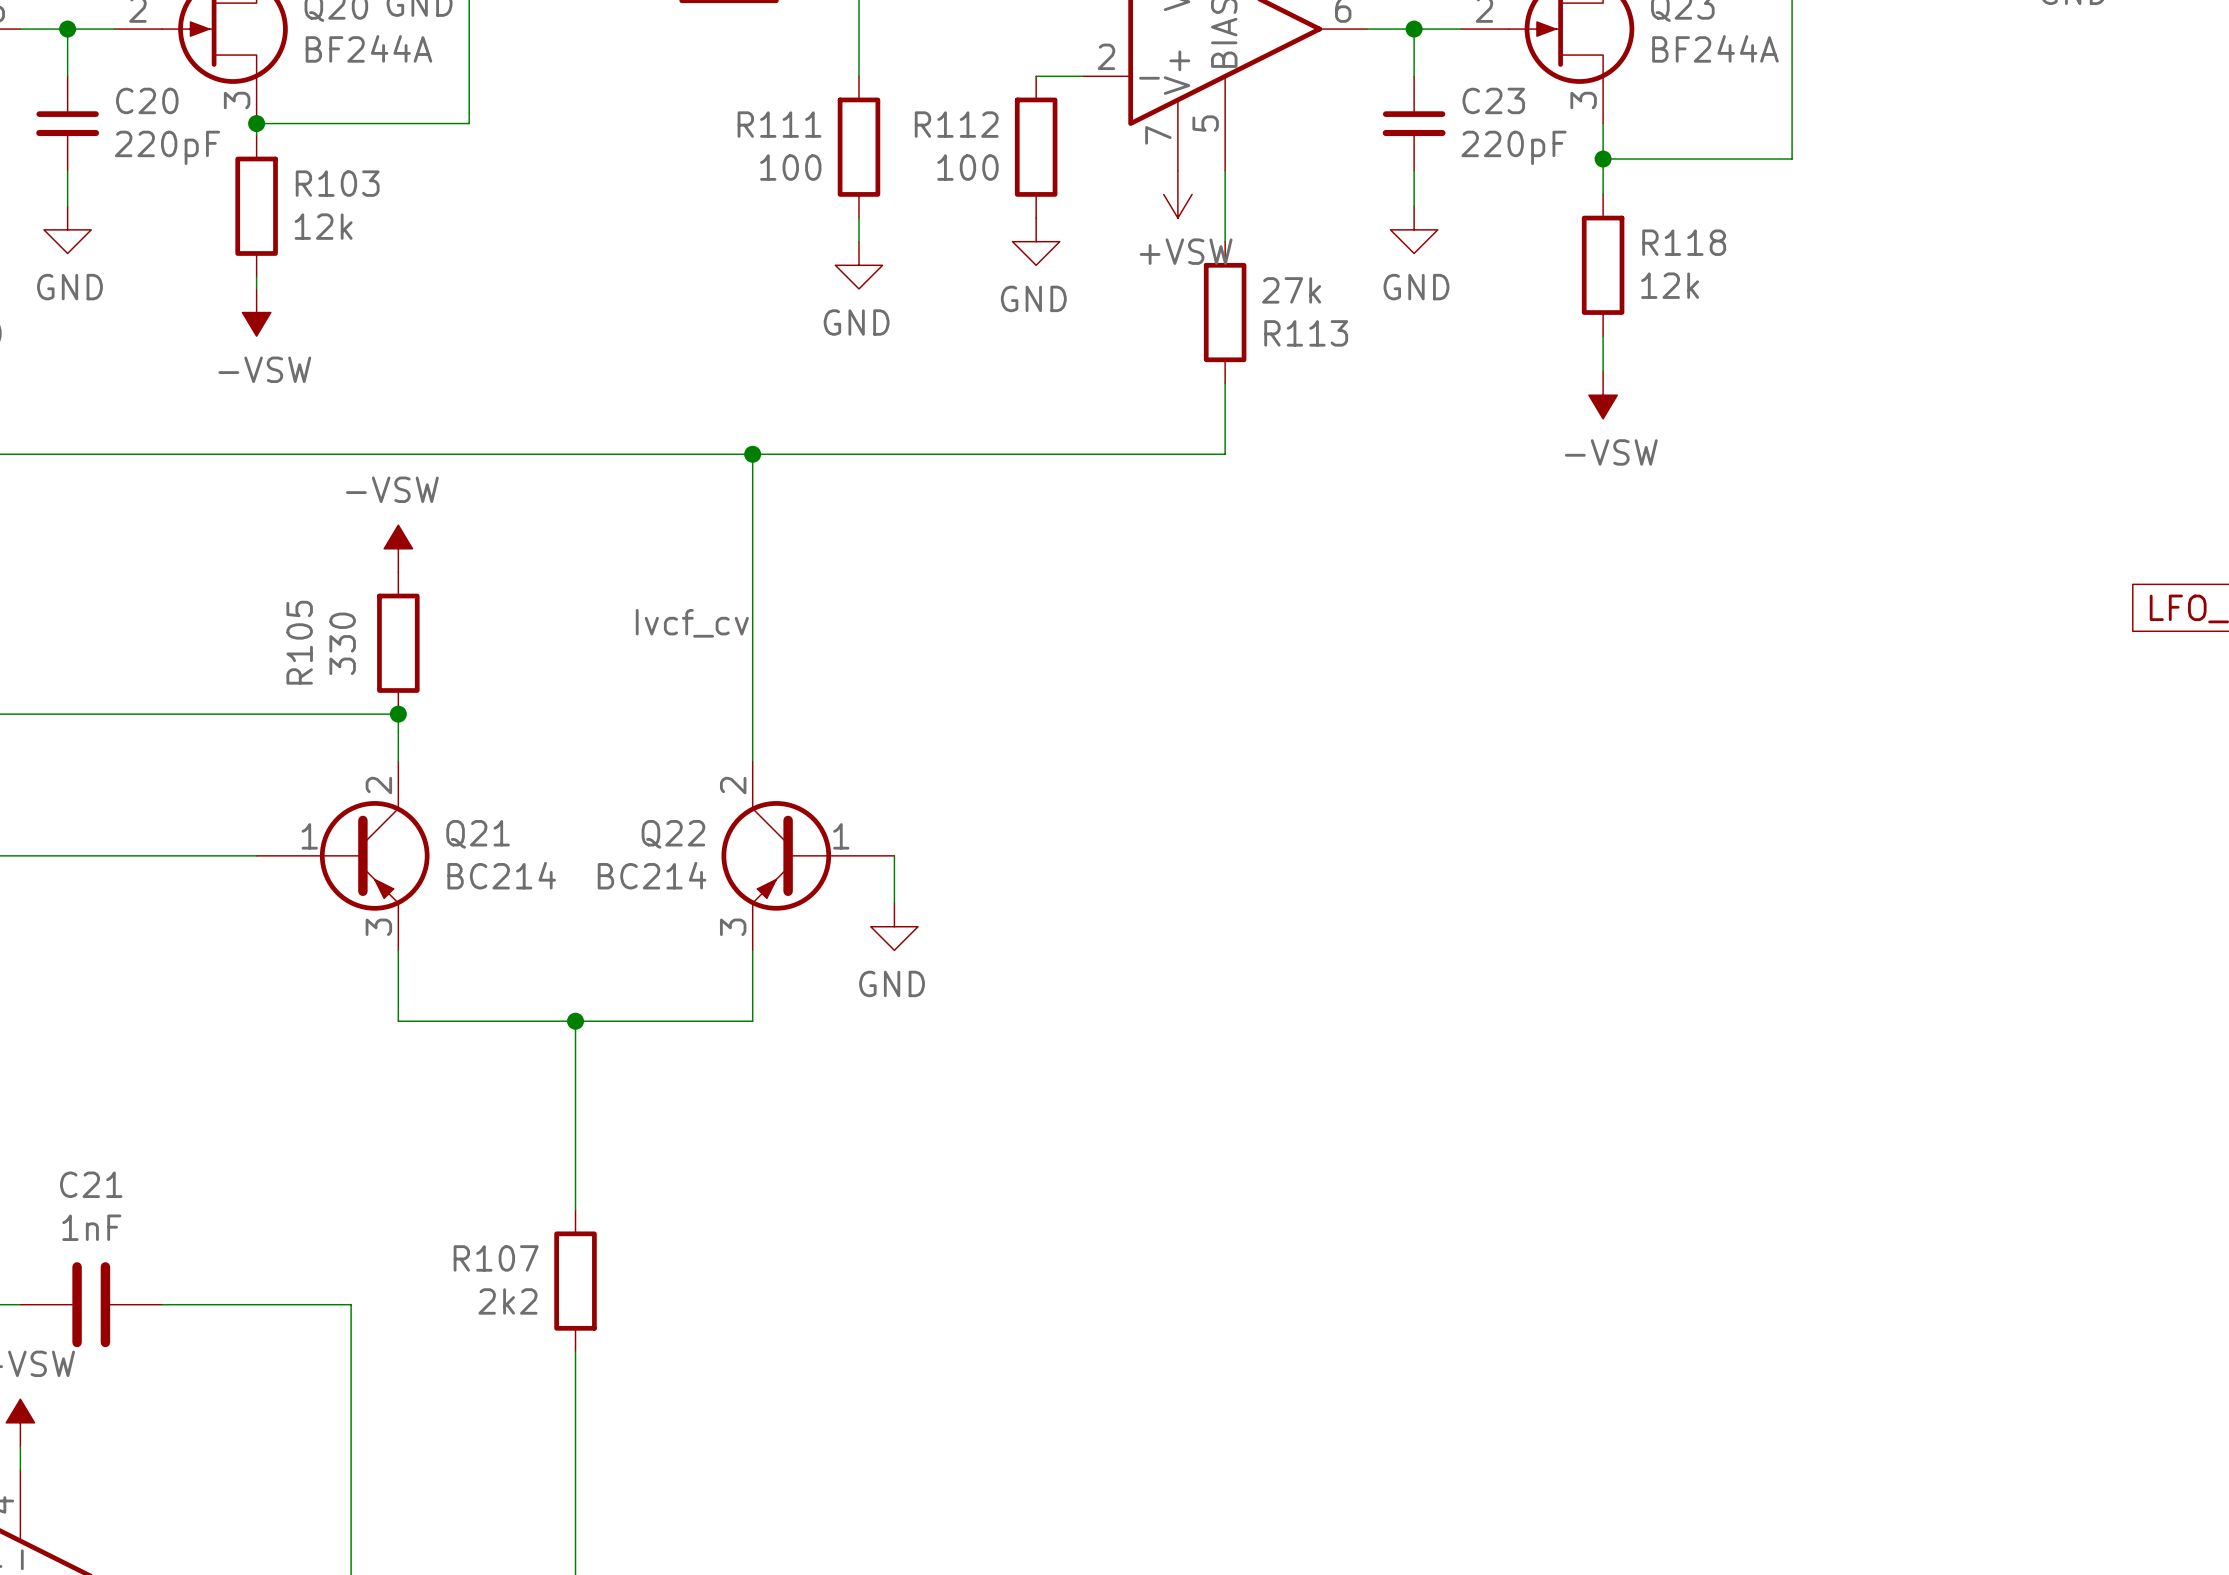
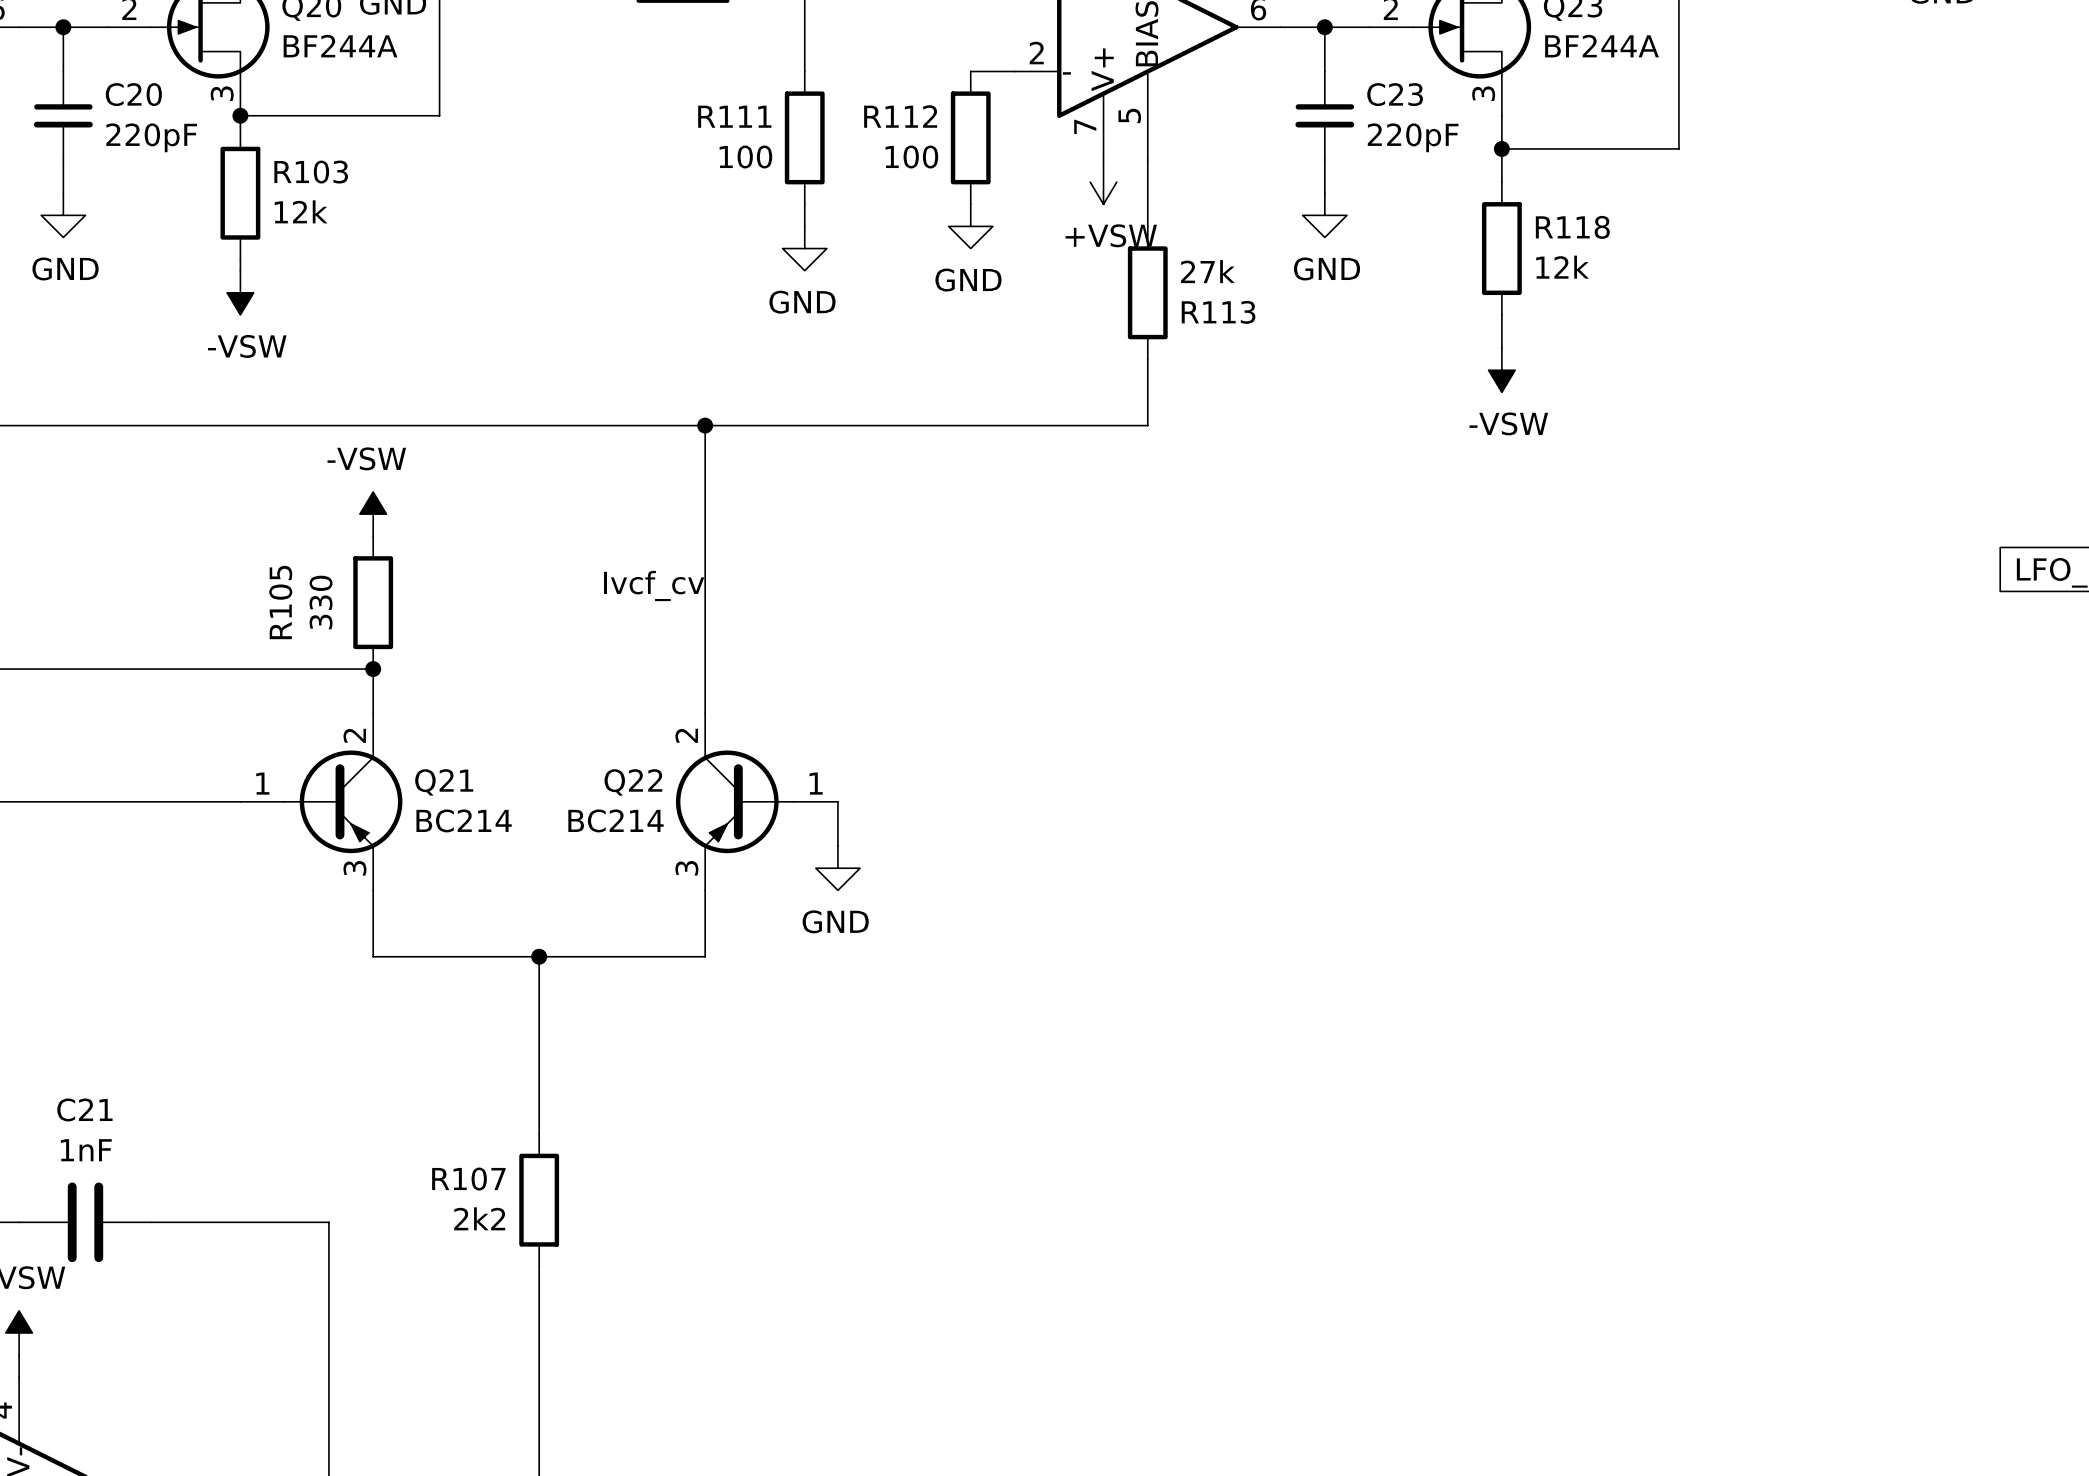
Q21 symbol: [256, 761, 430, 951] -> [240, 713, 403, 891]
Q22 symbol: [721, 761, 895, 951] -> [675, 713, 838, 891]

